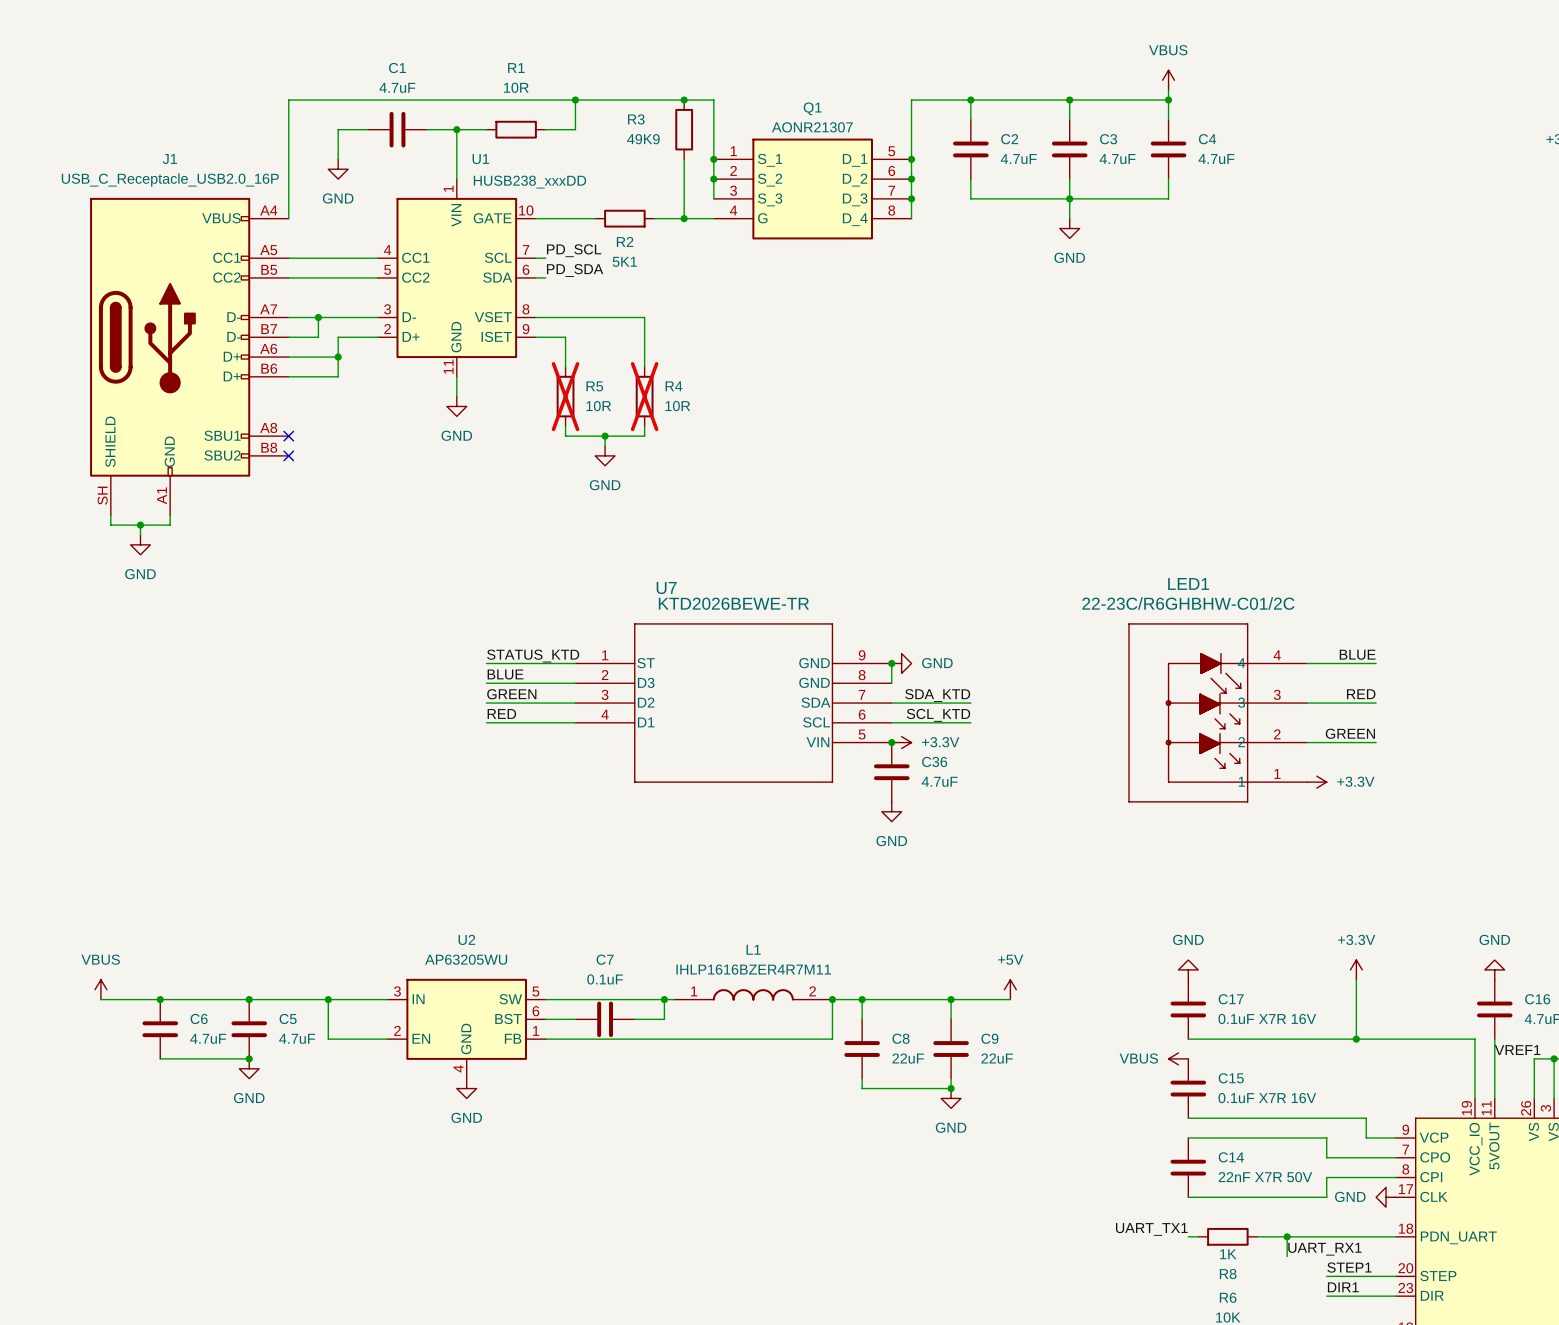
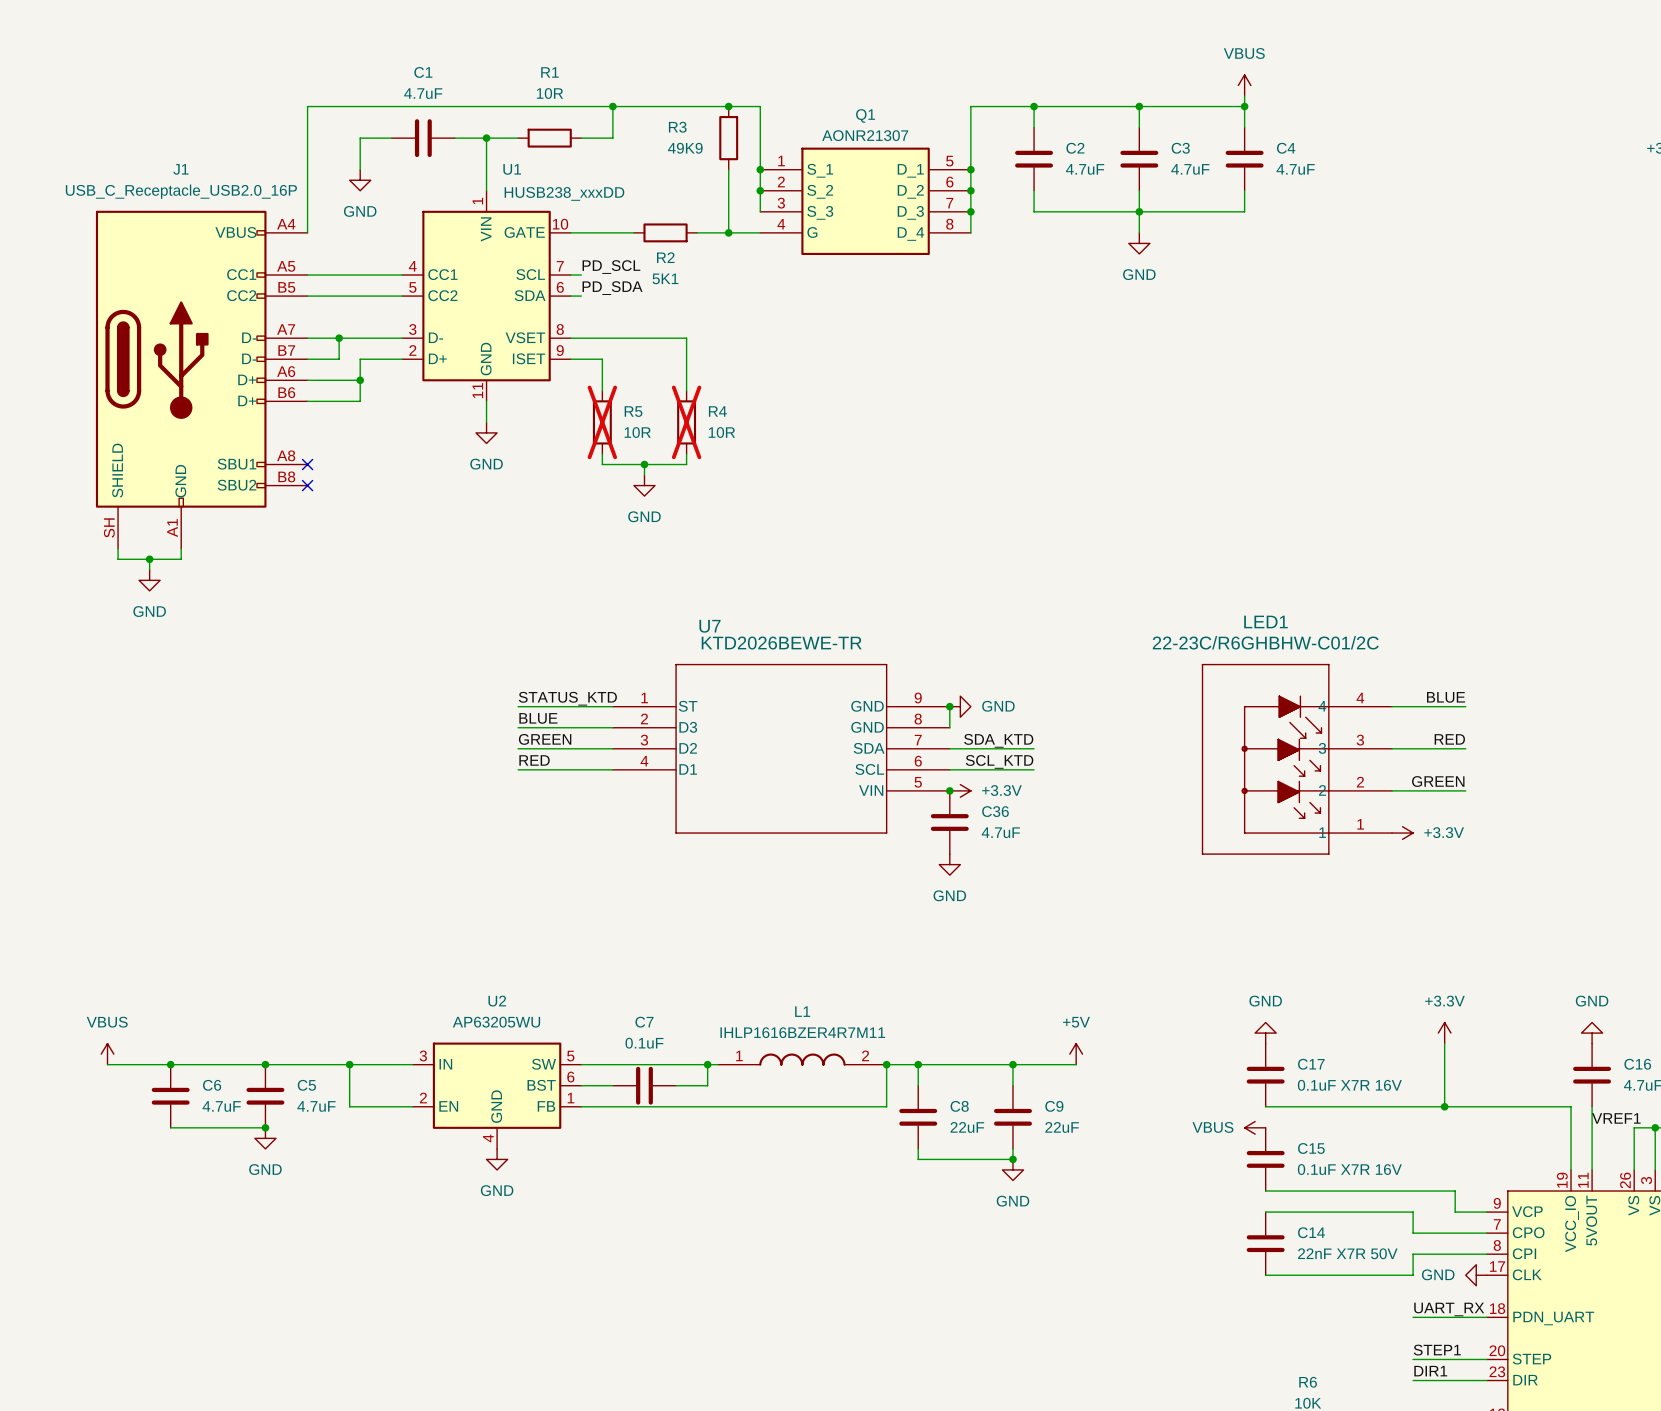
label: UART_TX1 (1151, 1229) -> none
wire: (1188, 1236) (1198, 1236) -> none
R8: 1K (1227, 1236) -> none
wire: (1257, 1236) (1326, 1236) -> none
wire: (1287, 1236) (1287, 1256) -> none
junction: (1287, 1236) -> none
label: UART_RX1 (1324, 1249) -> UART_RX (1449, 1309)

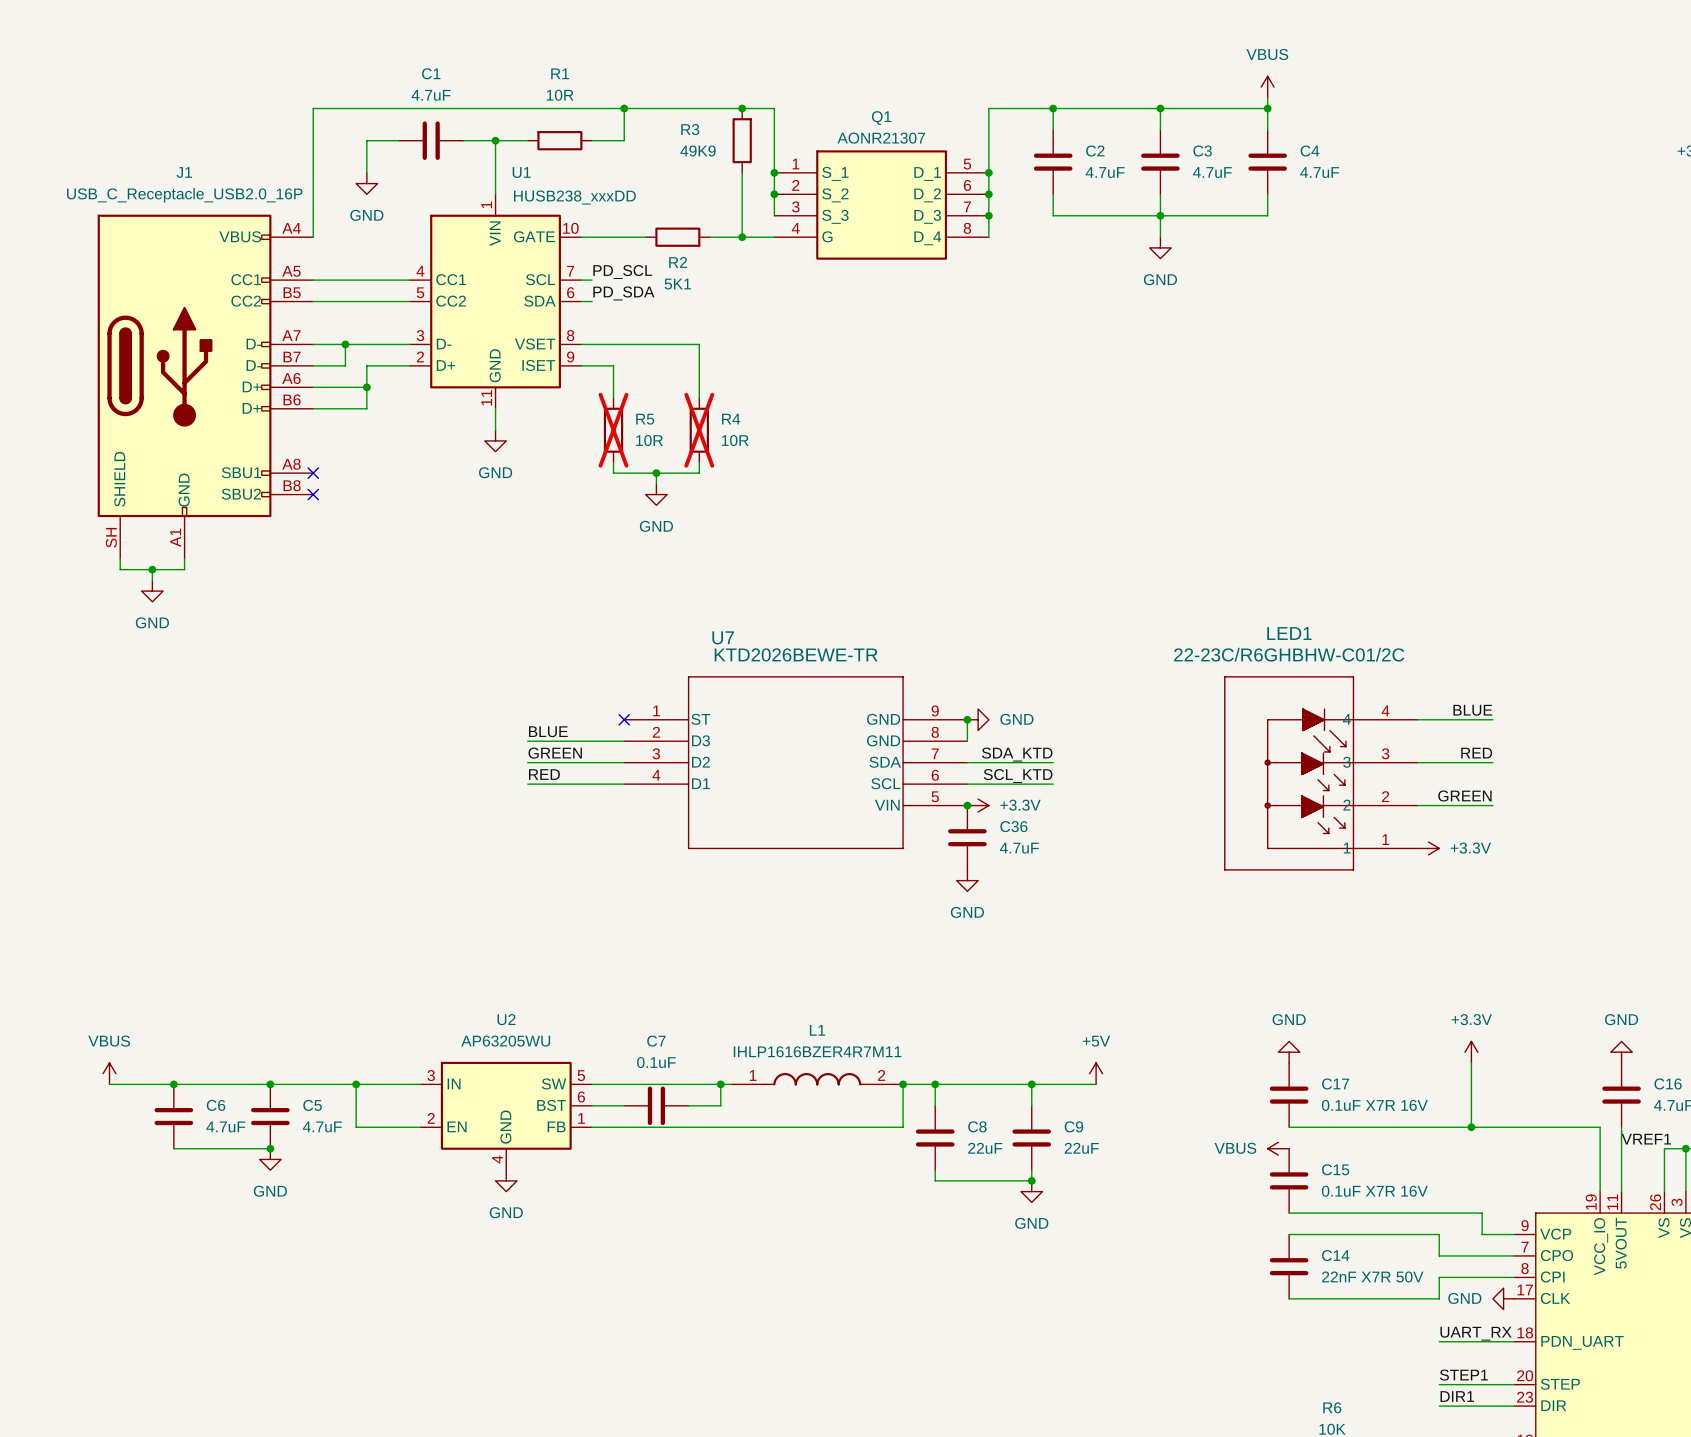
label: STATUS_KTD (567, 698) -> none
wire: (518, 706) (612, 706) -> none
no-connect mark: none -> (624, 719)

